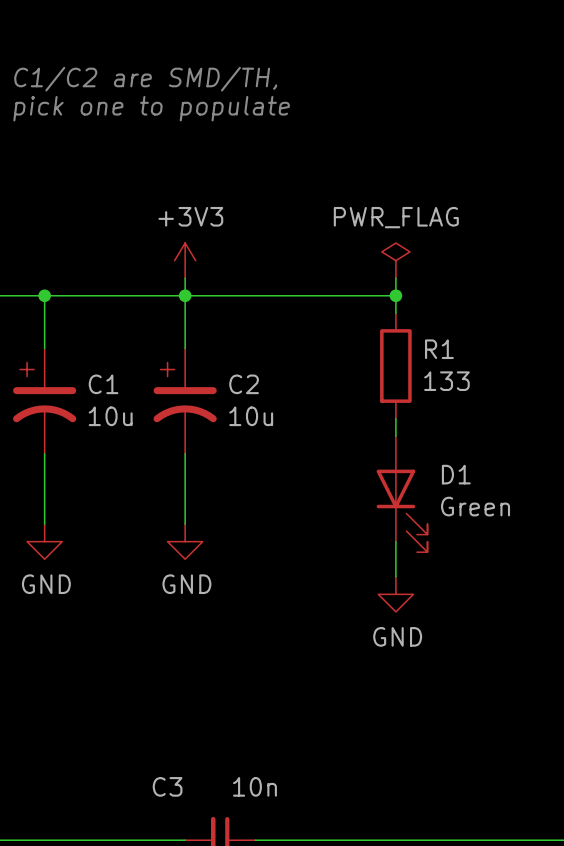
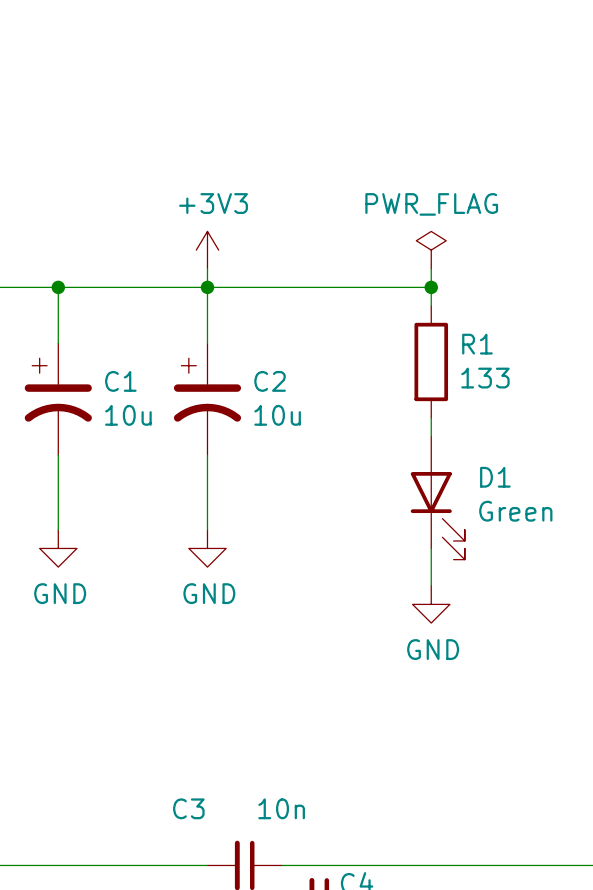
text: C1/C2 are SMD/TH, (145, 79) -> none
text: pick one to populate (151, 108) -> none

